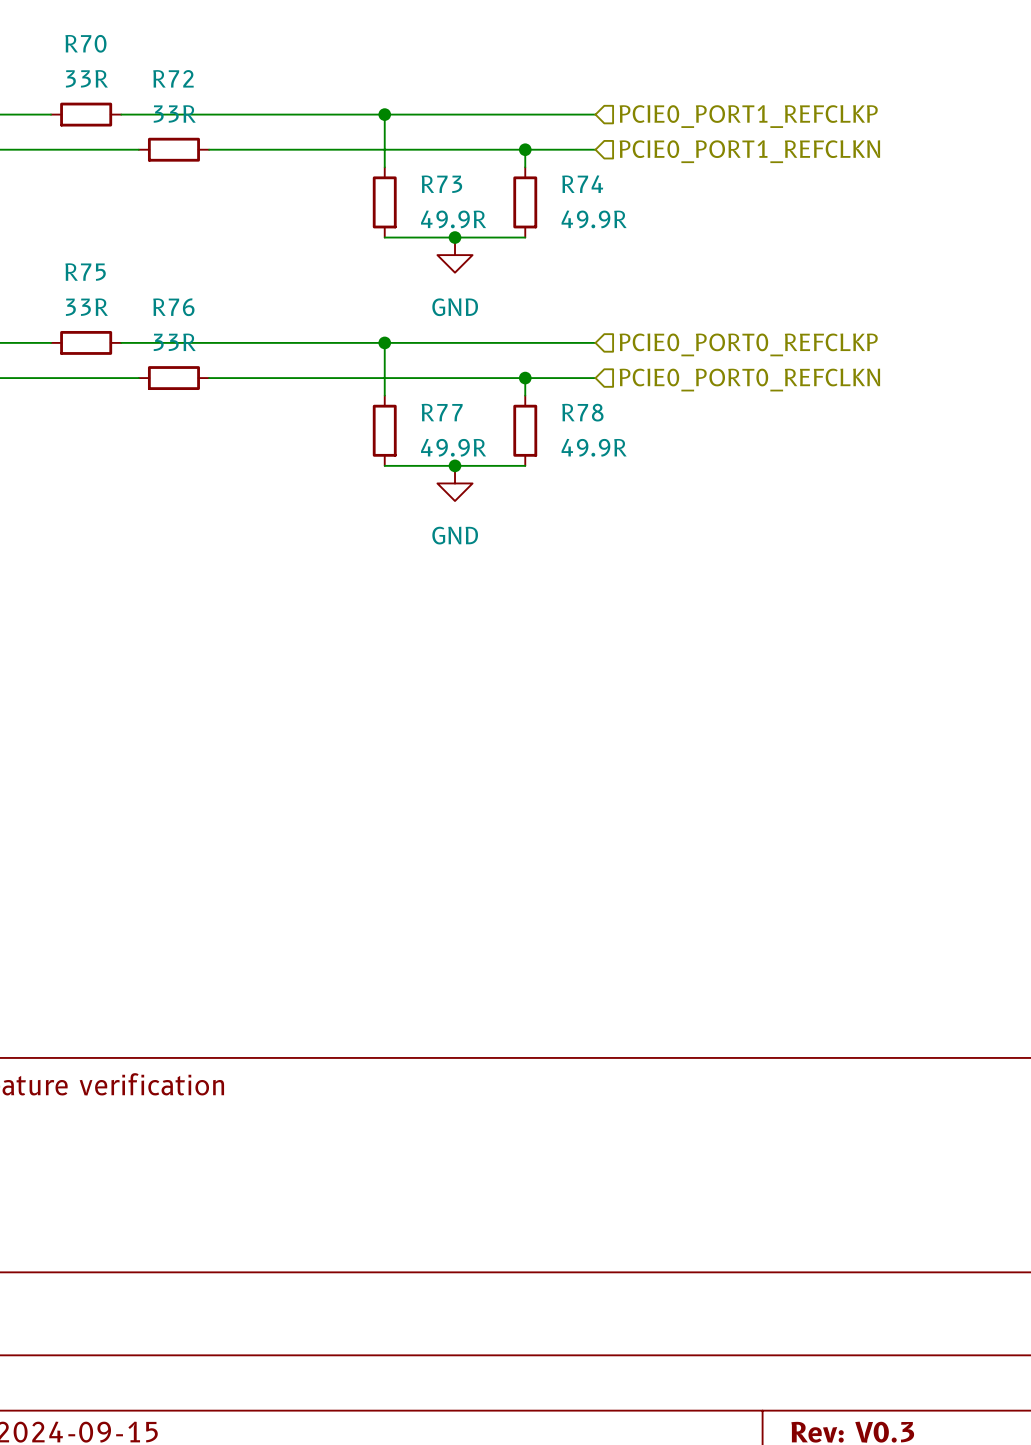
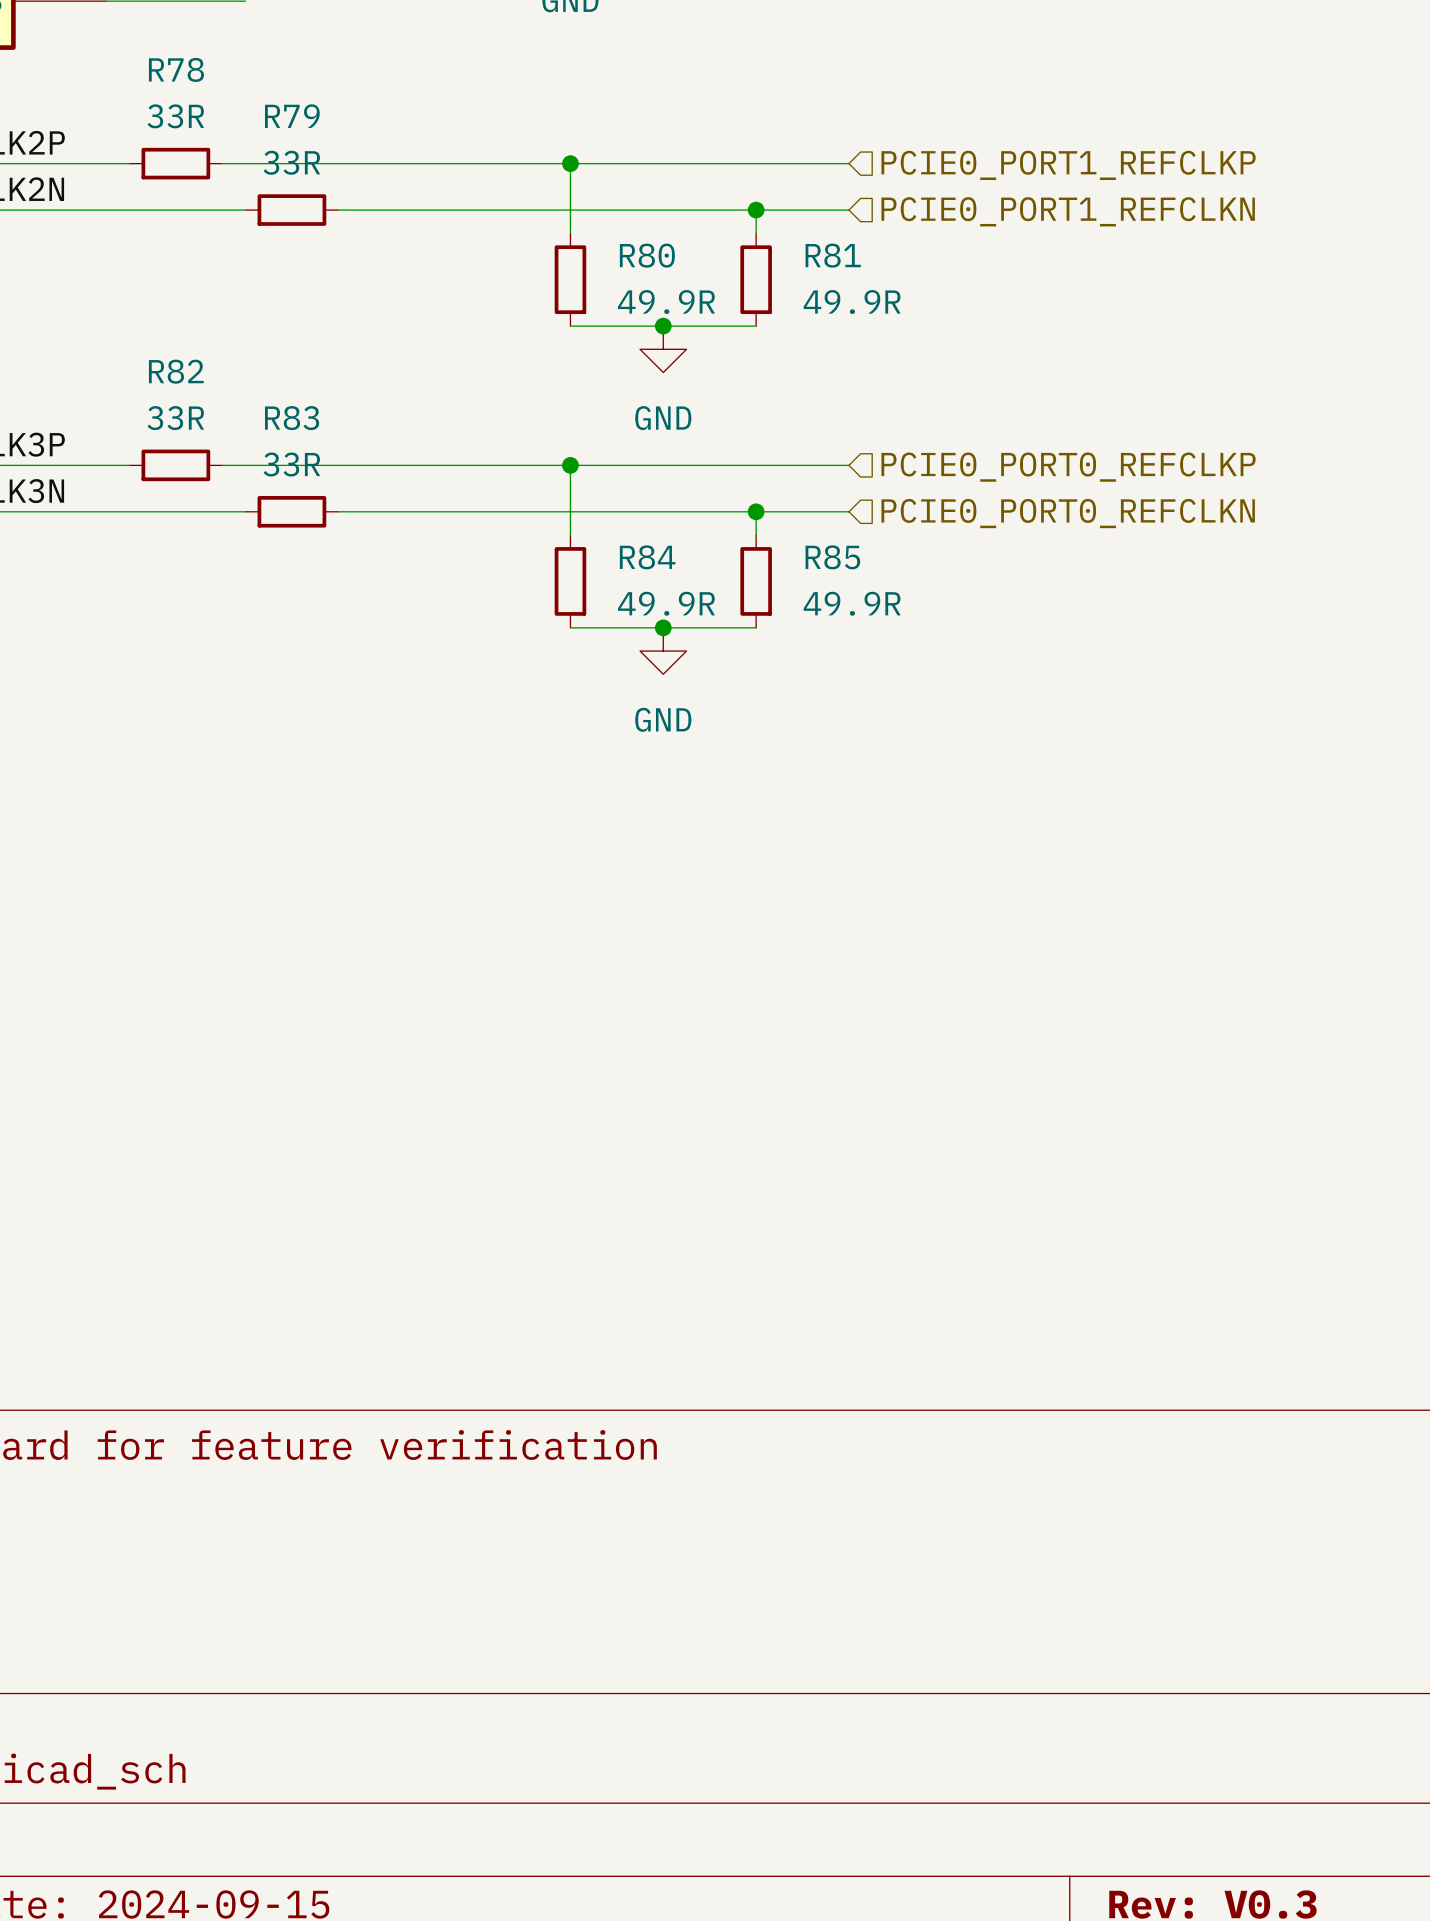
R70 name: R70 (85, 43) -> R78 (176, 69)
R72 name: R72 (173, 78) -> R79 (292, 116)
R73 name: R73 (441, 184) -> R80 (647, 255)
R74 name: R74 (582, 184) -> R81 (833, 255)
R75 name: R75 (85, 272) -> R82 (176, 371)
R76 name: R76 (173, 307) -> R83 (292, 418)
R77 name: R77 (442, 412) -> R84 (647, 557)
R78 name: R78 (582, 412) -> R85 (832, 557)

